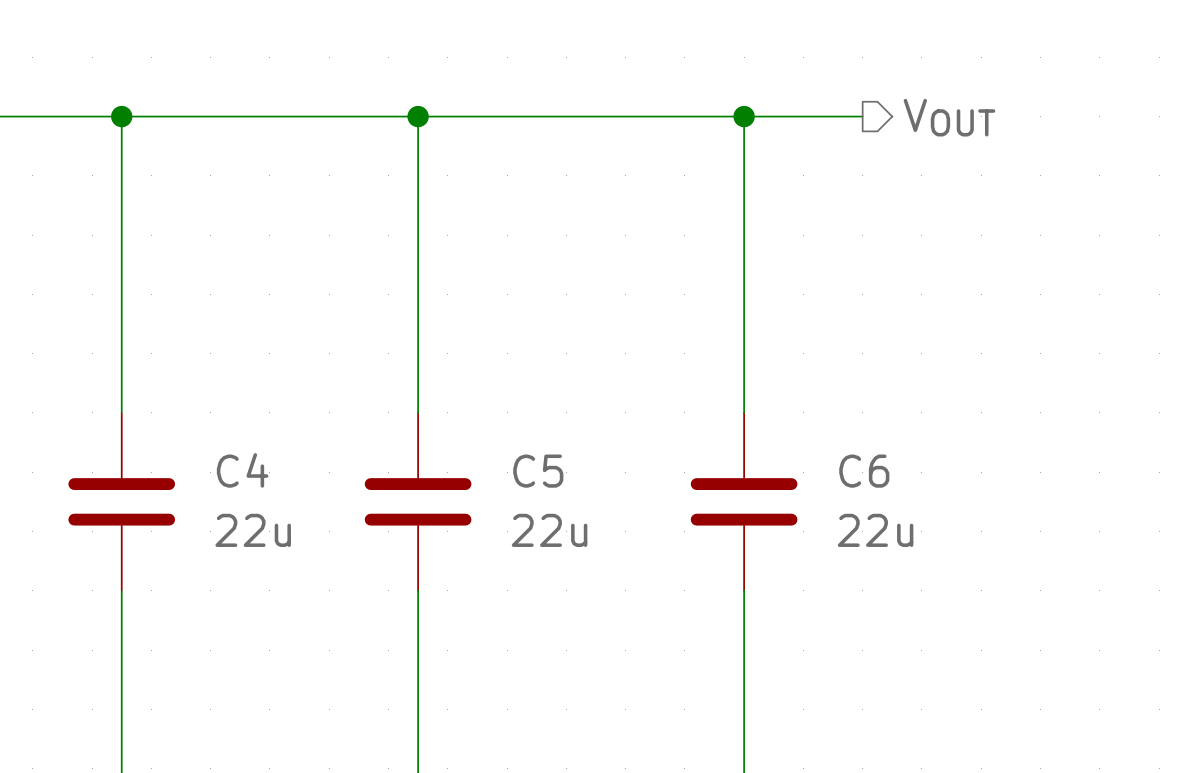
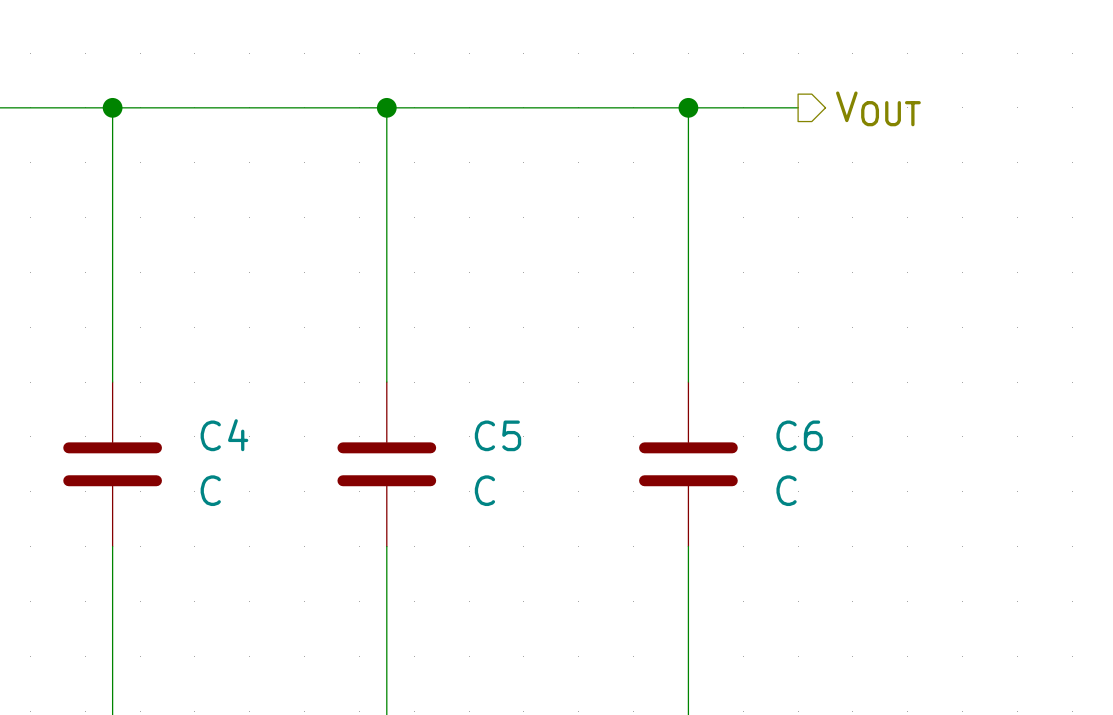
C4 value: 22u (253, 530) -> C (210, 490)
C5 value: 22u (549, 530) -> C (484, 490)
C6 value: 22u (875, 530) -> C (786, 490)

